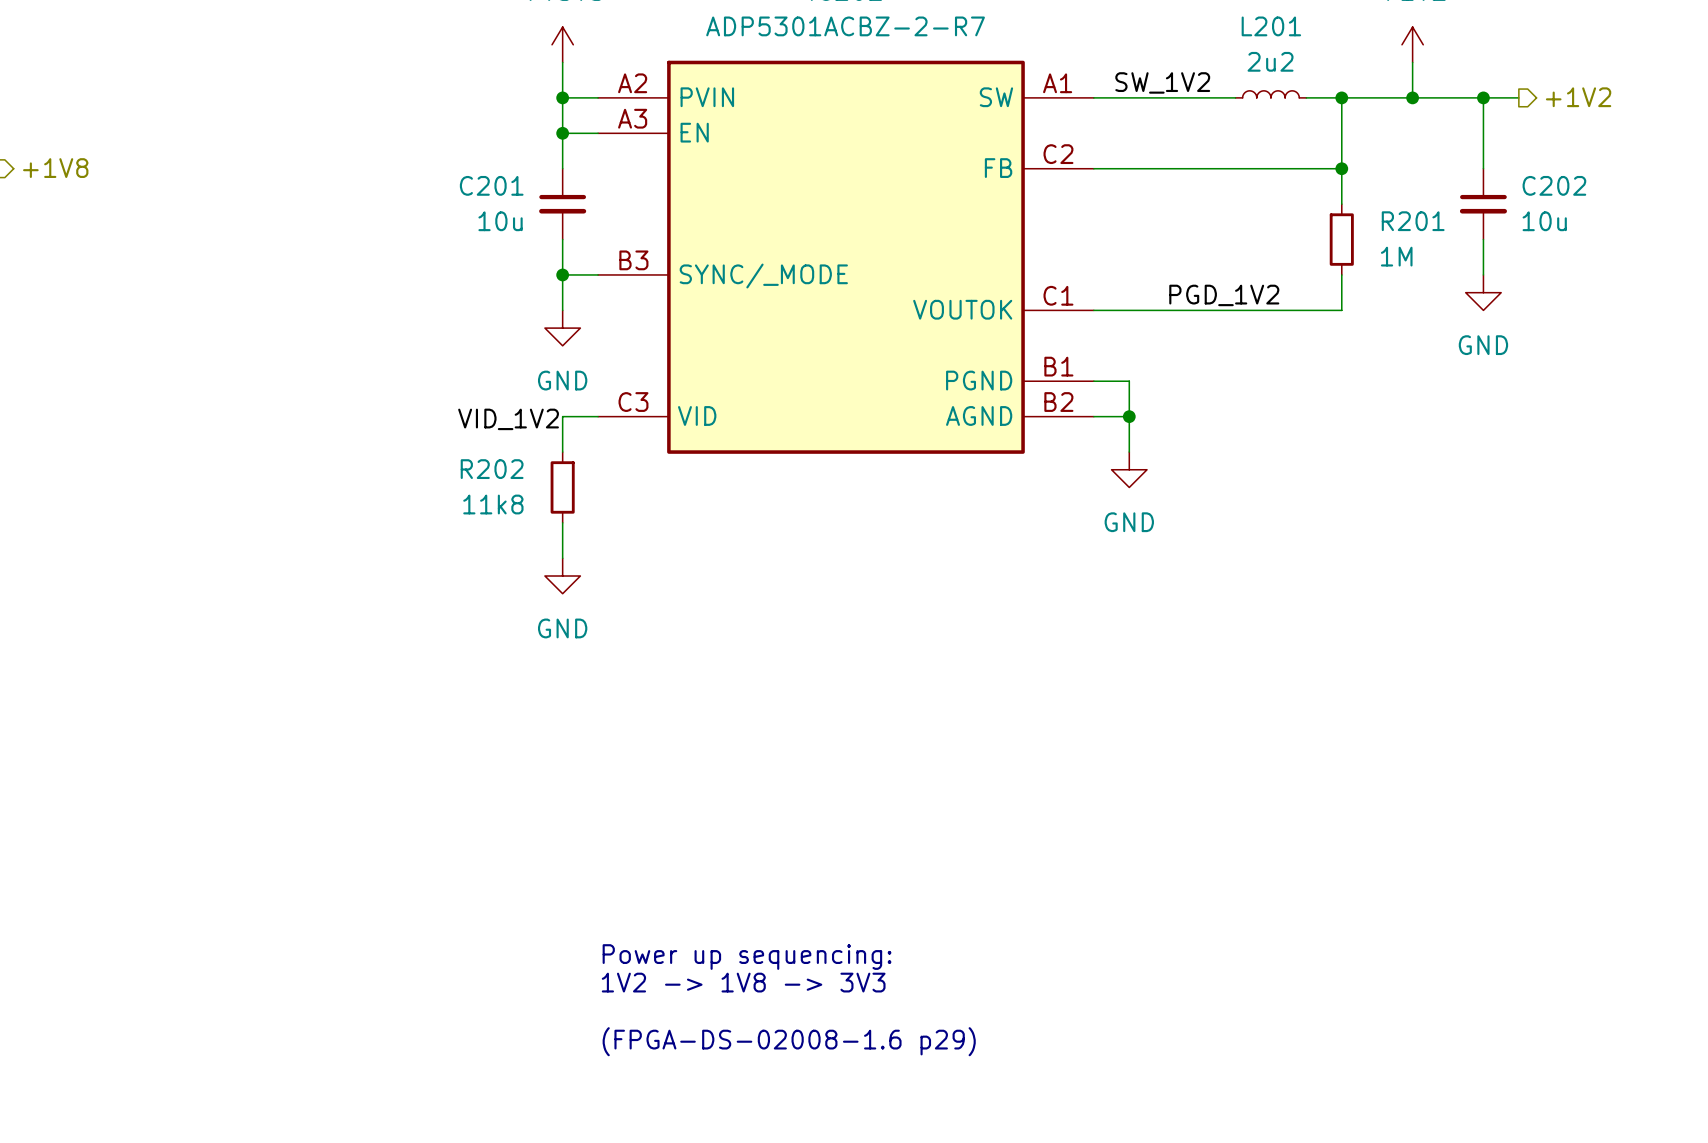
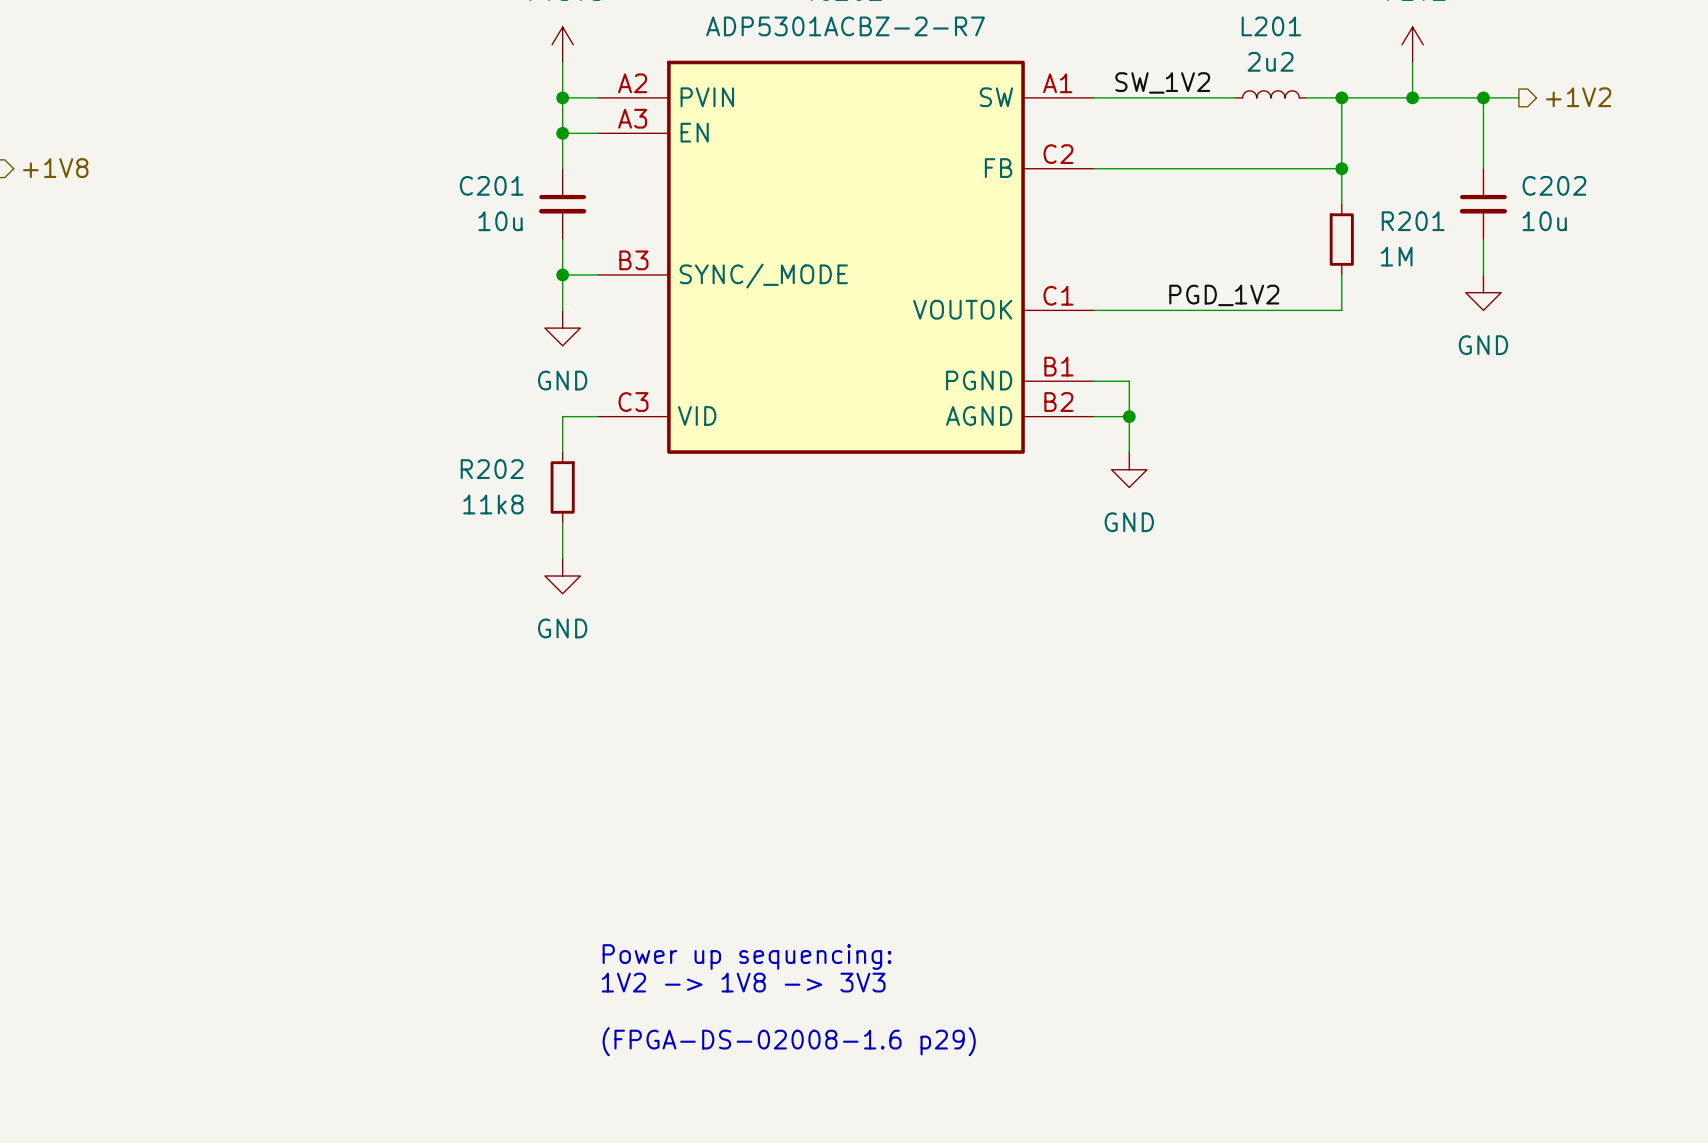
label: VID_1V2 (508, 419) -> none

